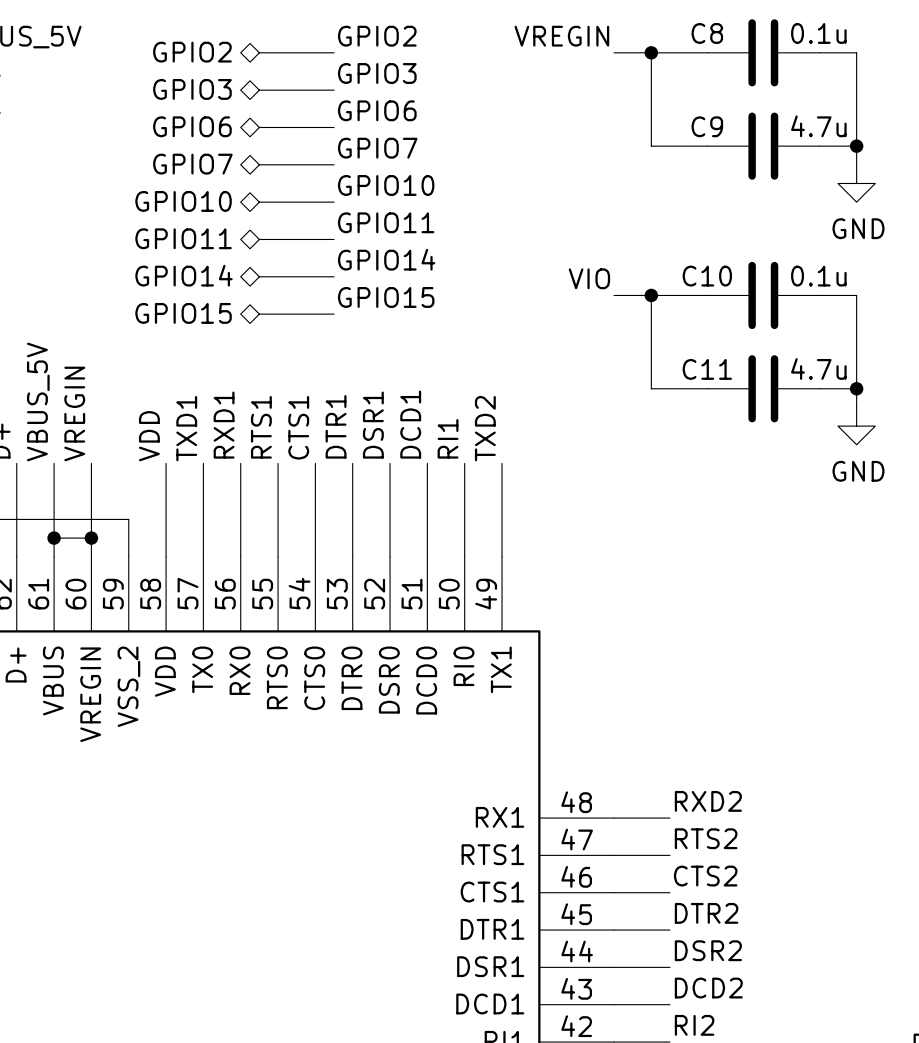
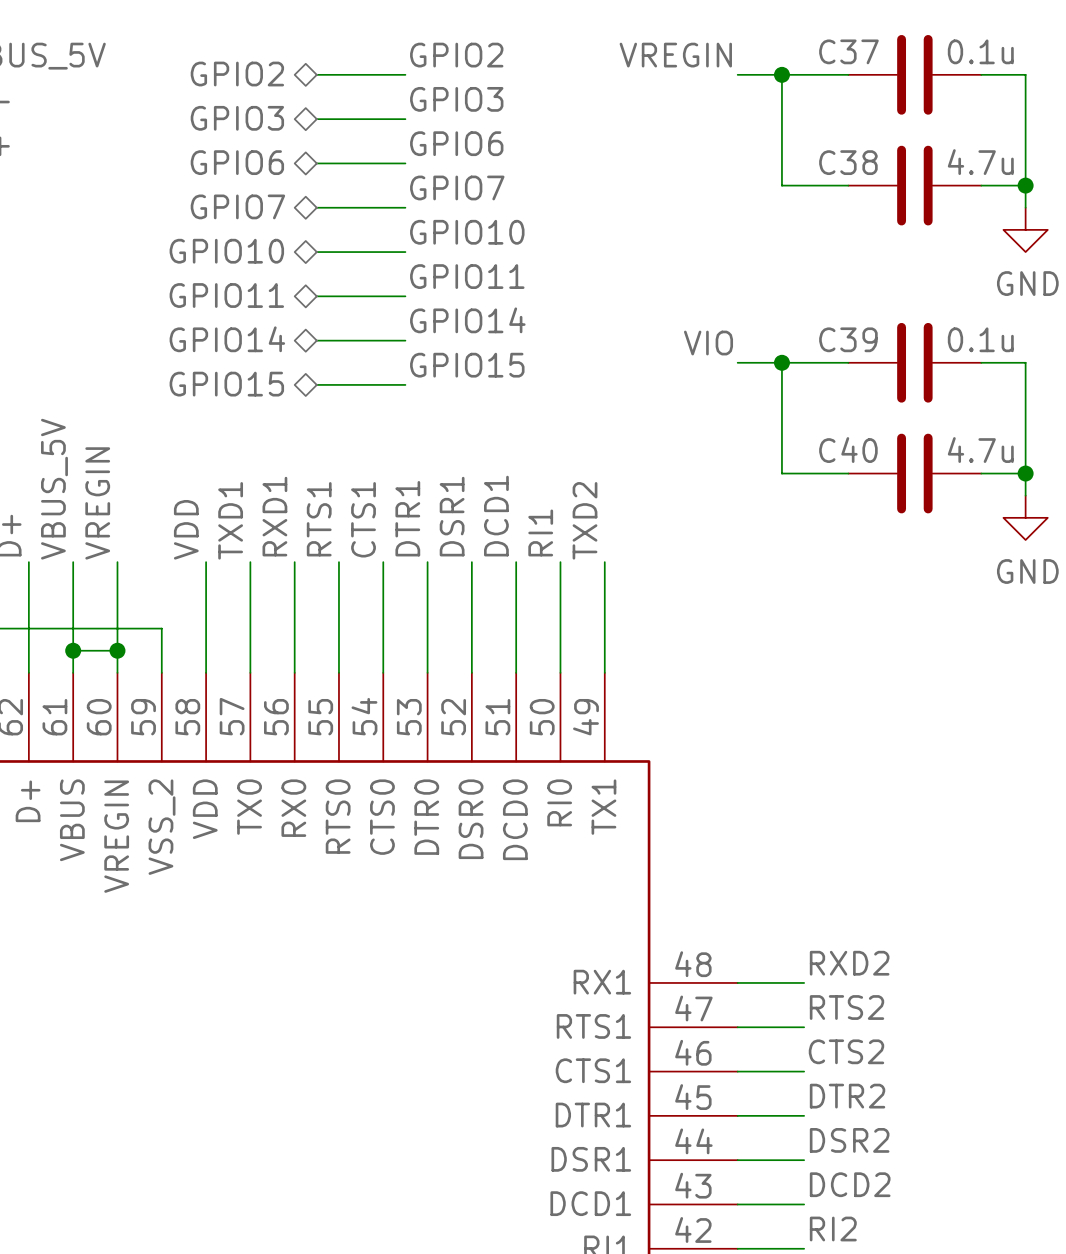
C8 name: C8 (707, 33) -> C37 (848, 51)
C9 name: C9 (707, 126) -> C38 (848, 162)
C10 name: C10 (707, 276) -> C39 (848, 339)
C11 name: C11 (707, 369) -> C40 (848, 450)

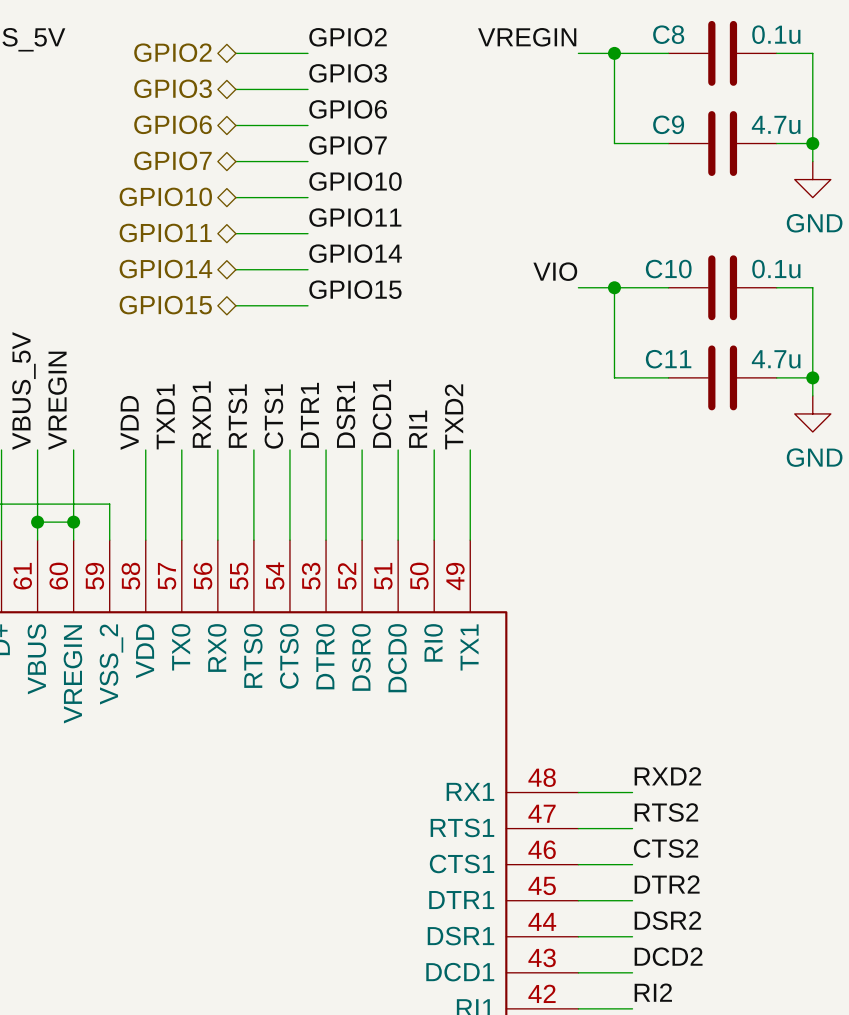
C37 name: C37 (848, 51) -> C8 (668, 34)
C38 name: C38 (848, 162) -> C9 (668, 124)
C39 name: C39 (848, 339) -> C10 (668, 269)
C40 name: C40 (848, 450) -> C11 (668, 359)

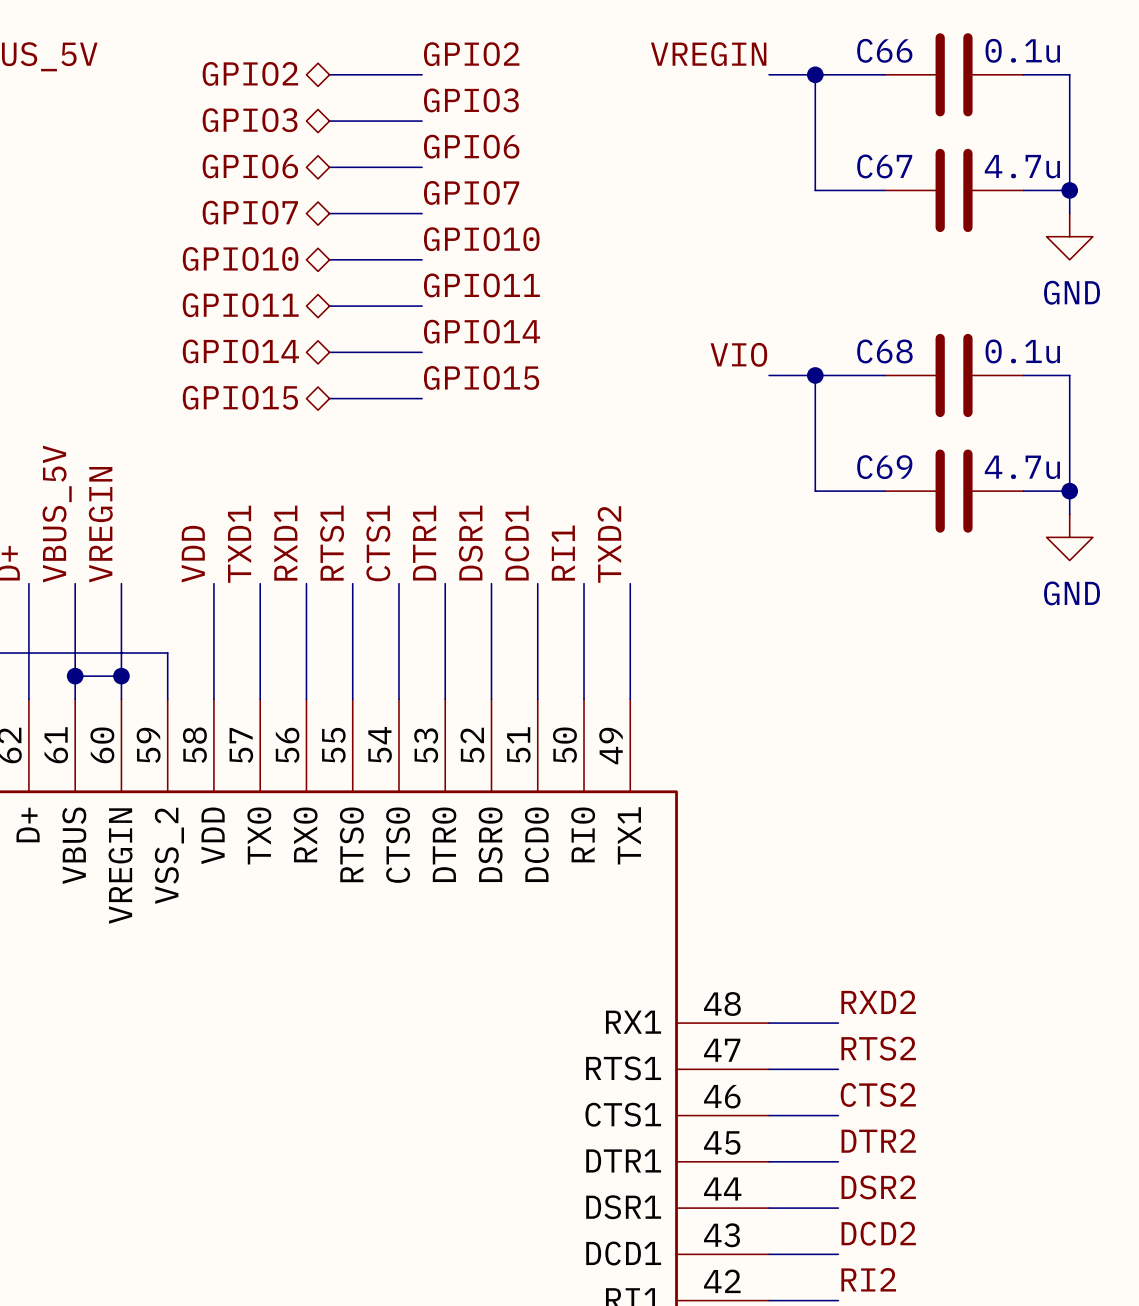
C8 name: C8 (668, 34) -> C66 (884, 50)
C9 name: C9 (668, 124) -> C67 (884, 166)
C10 name: C10 (668, 269) -> C68 (884, 351)
C11 name: C11 (668, 359) -> C69 (884, 467)

